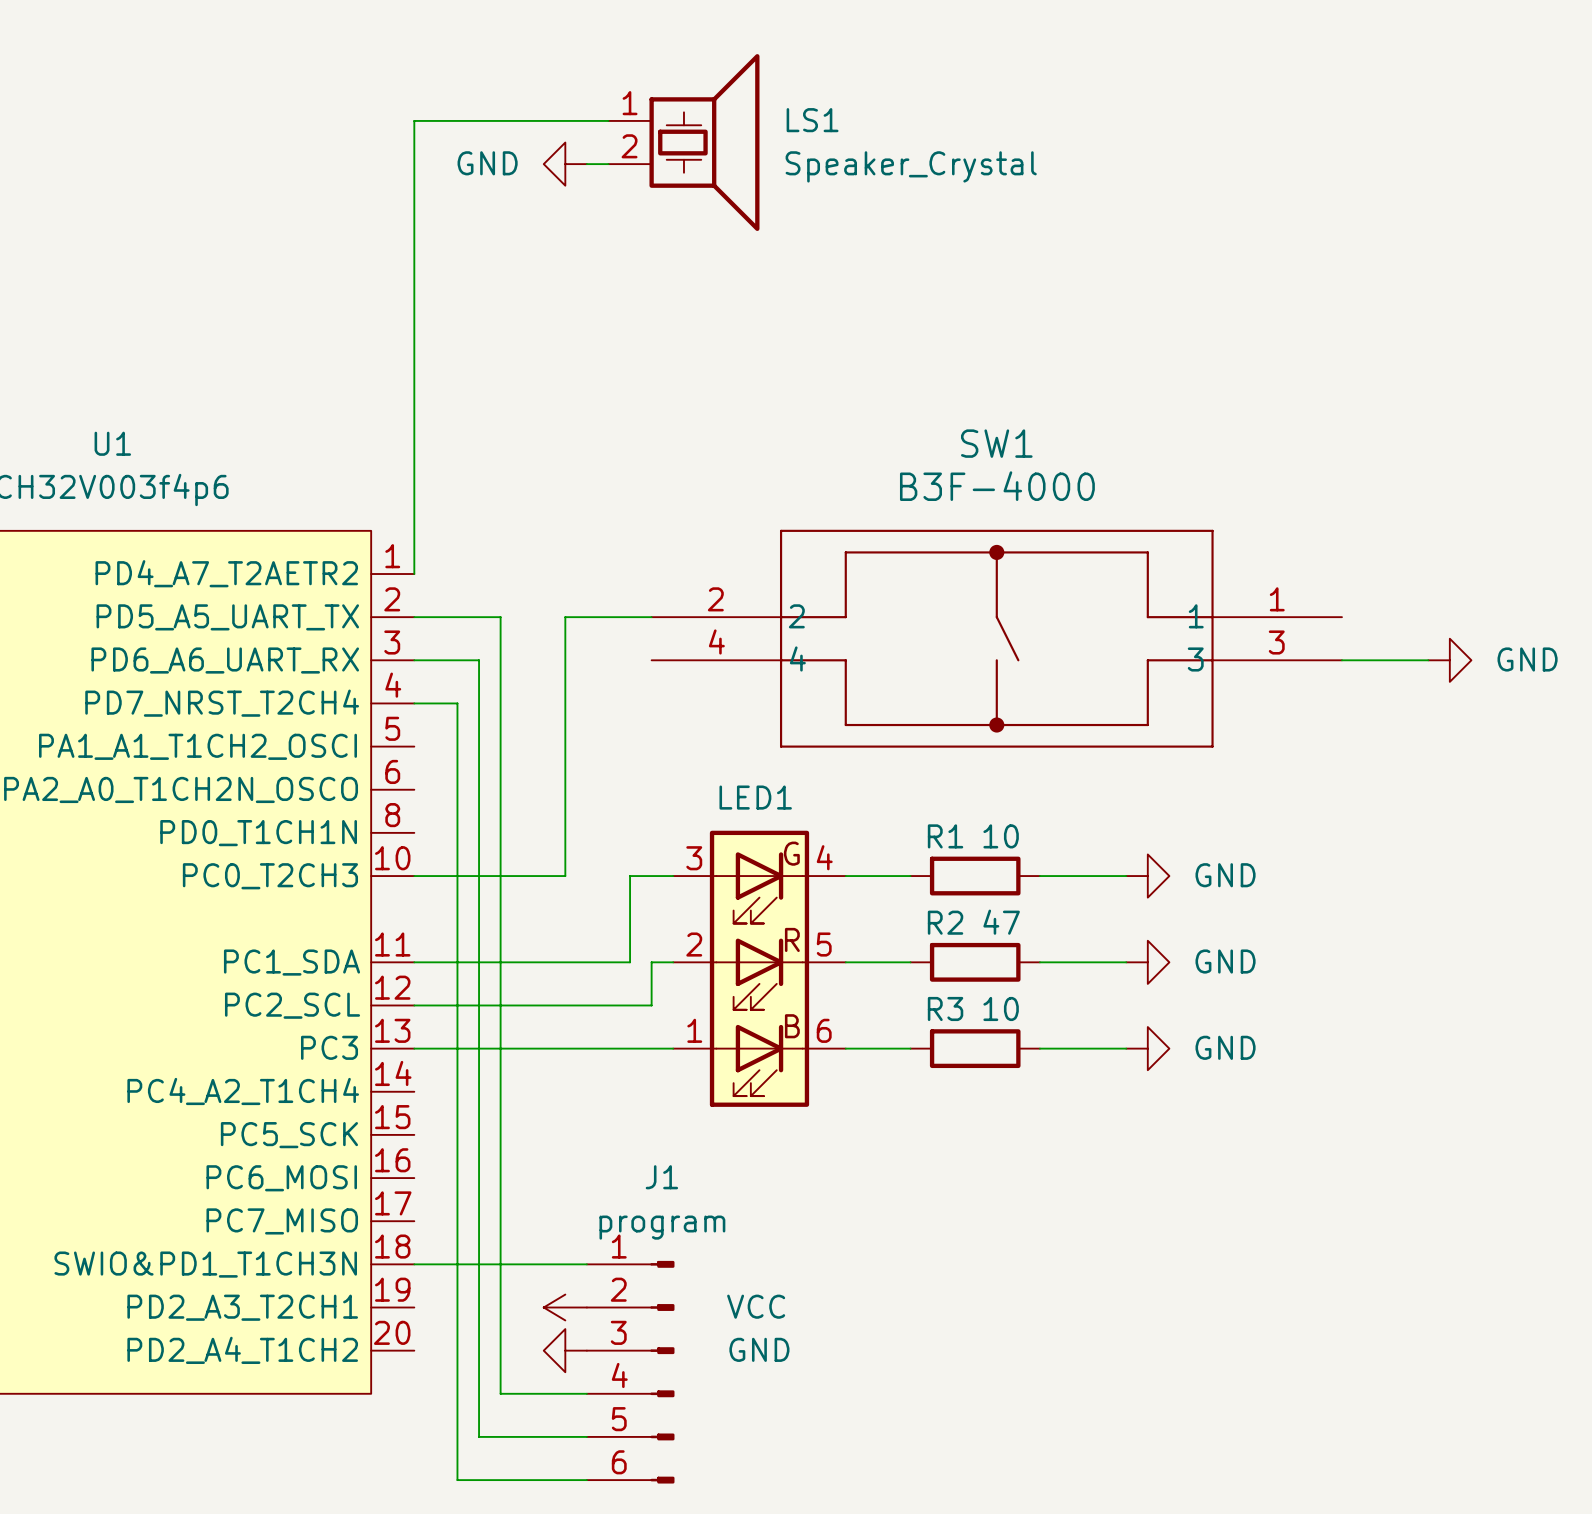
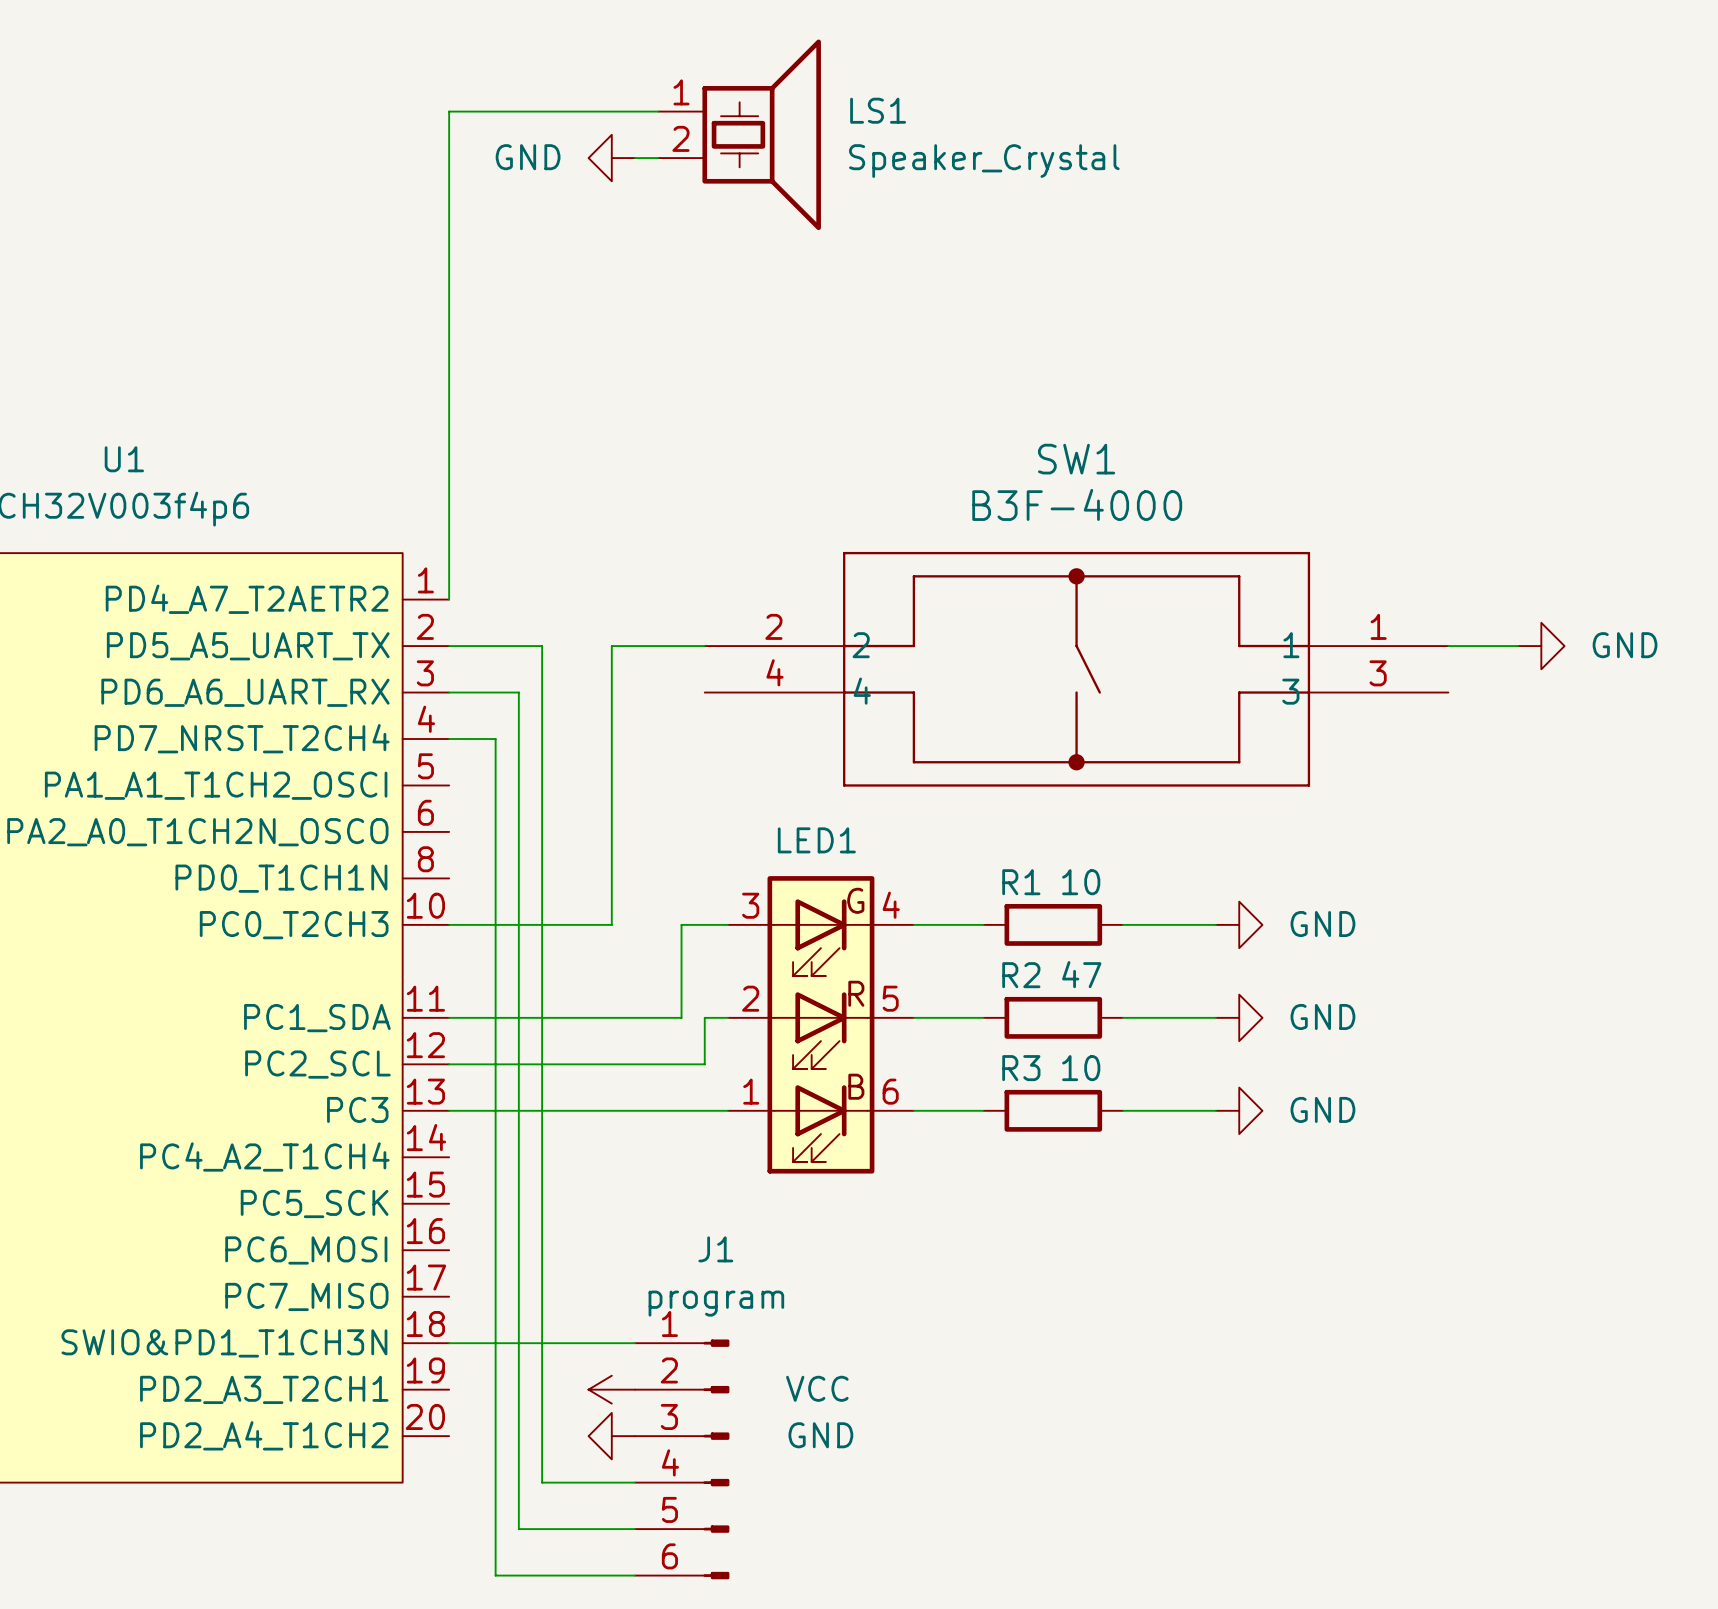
wire: none -> (1448, 646) (1518, 646)
wire: (1341, 660) (1428, 660) -> none
power symbol position: GND (1449, 660) -> GND (1541, 646)

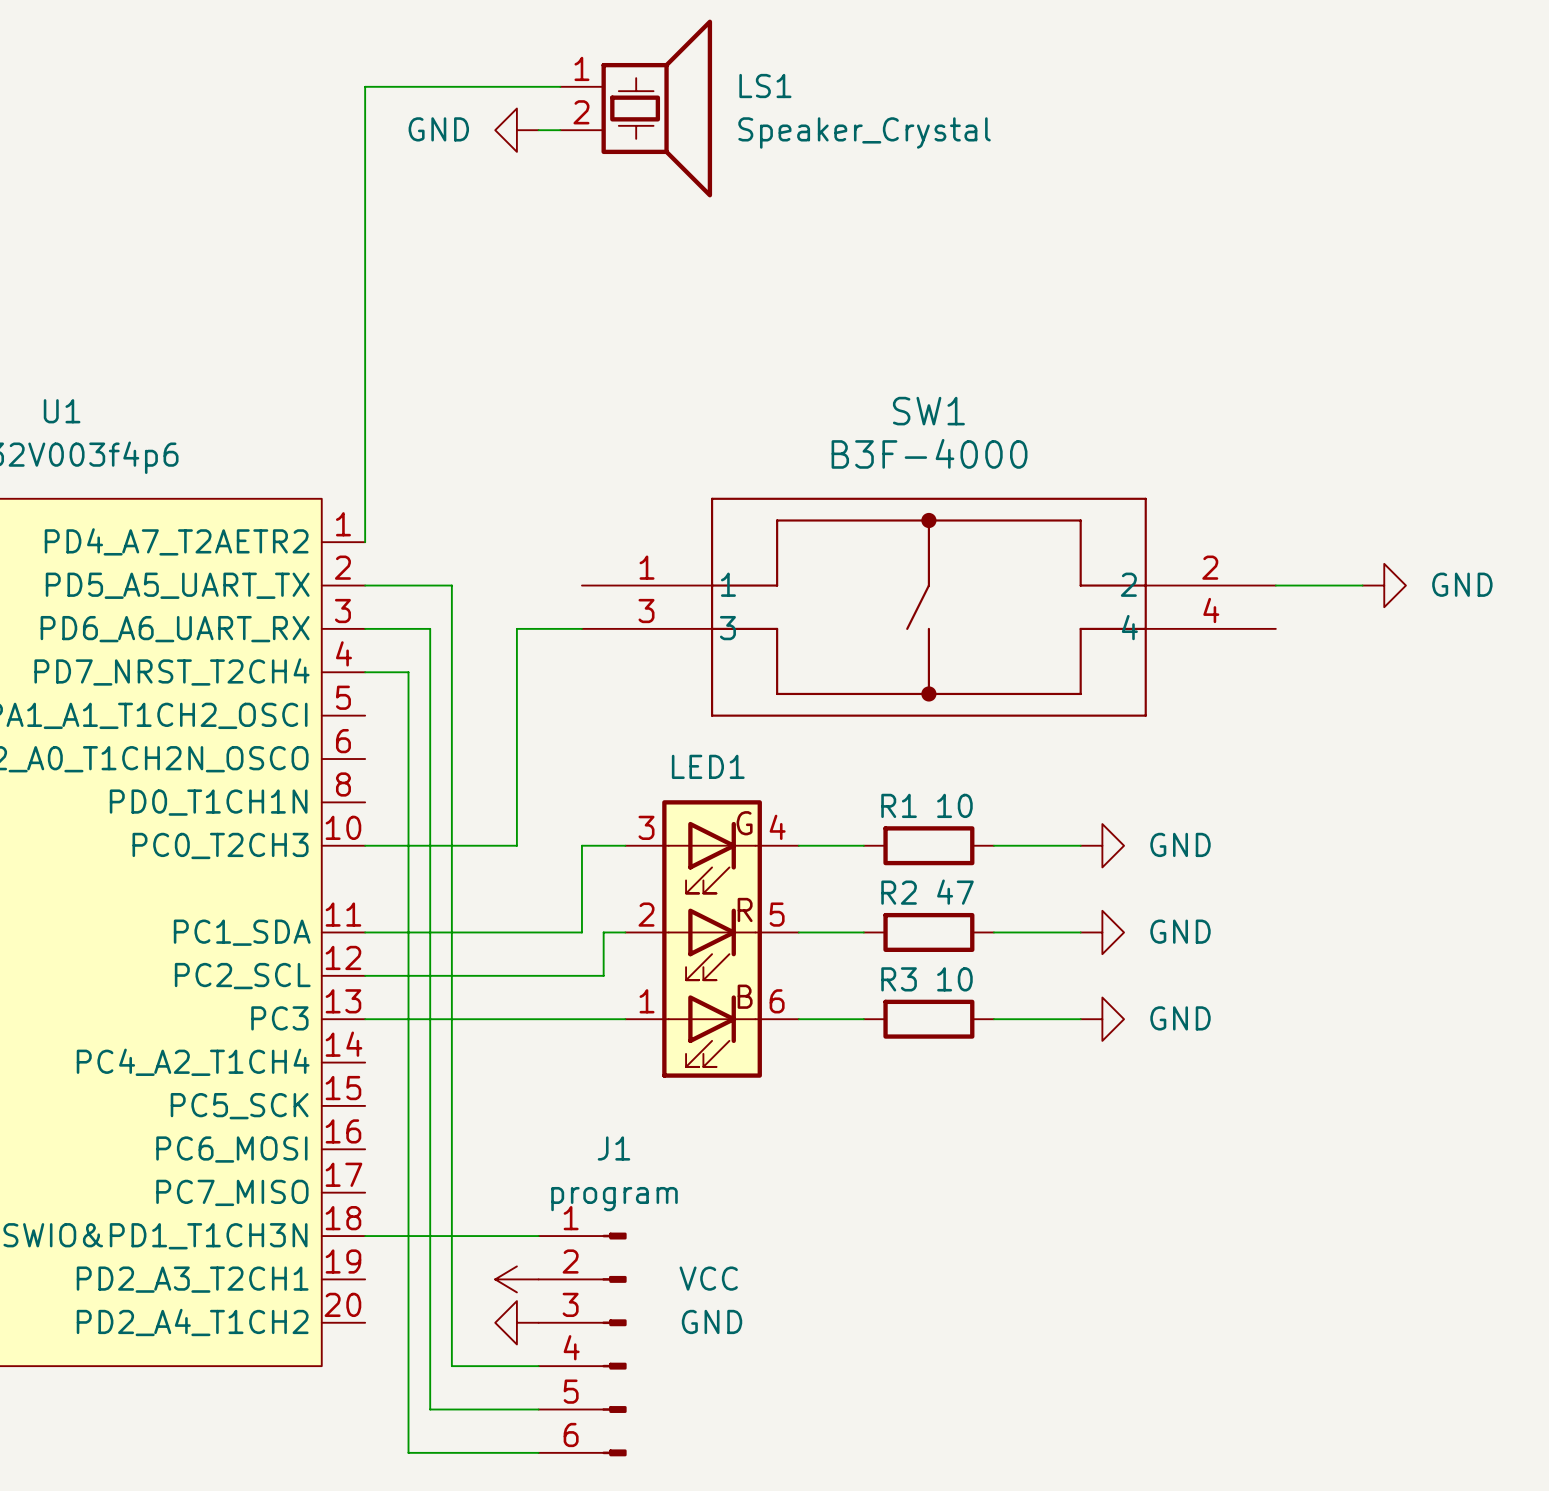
wire: (704, 646) (611, 646) (611, 692) -> (581, 628) (516, 628)
SW1 flip: as is (1076, 669) -> left-right (928, 607)

